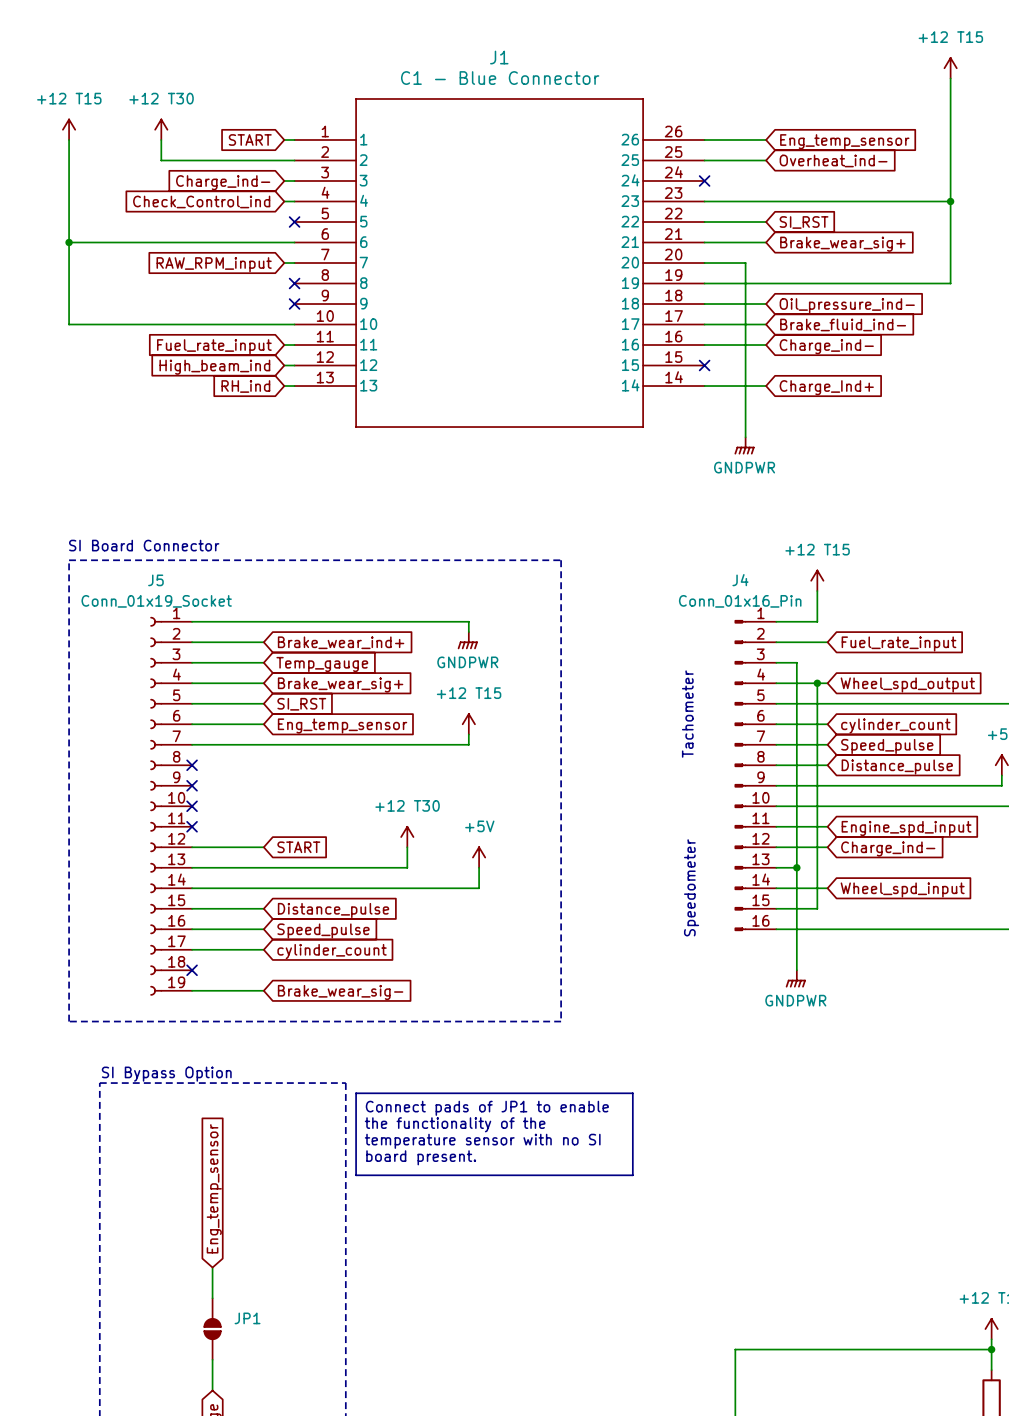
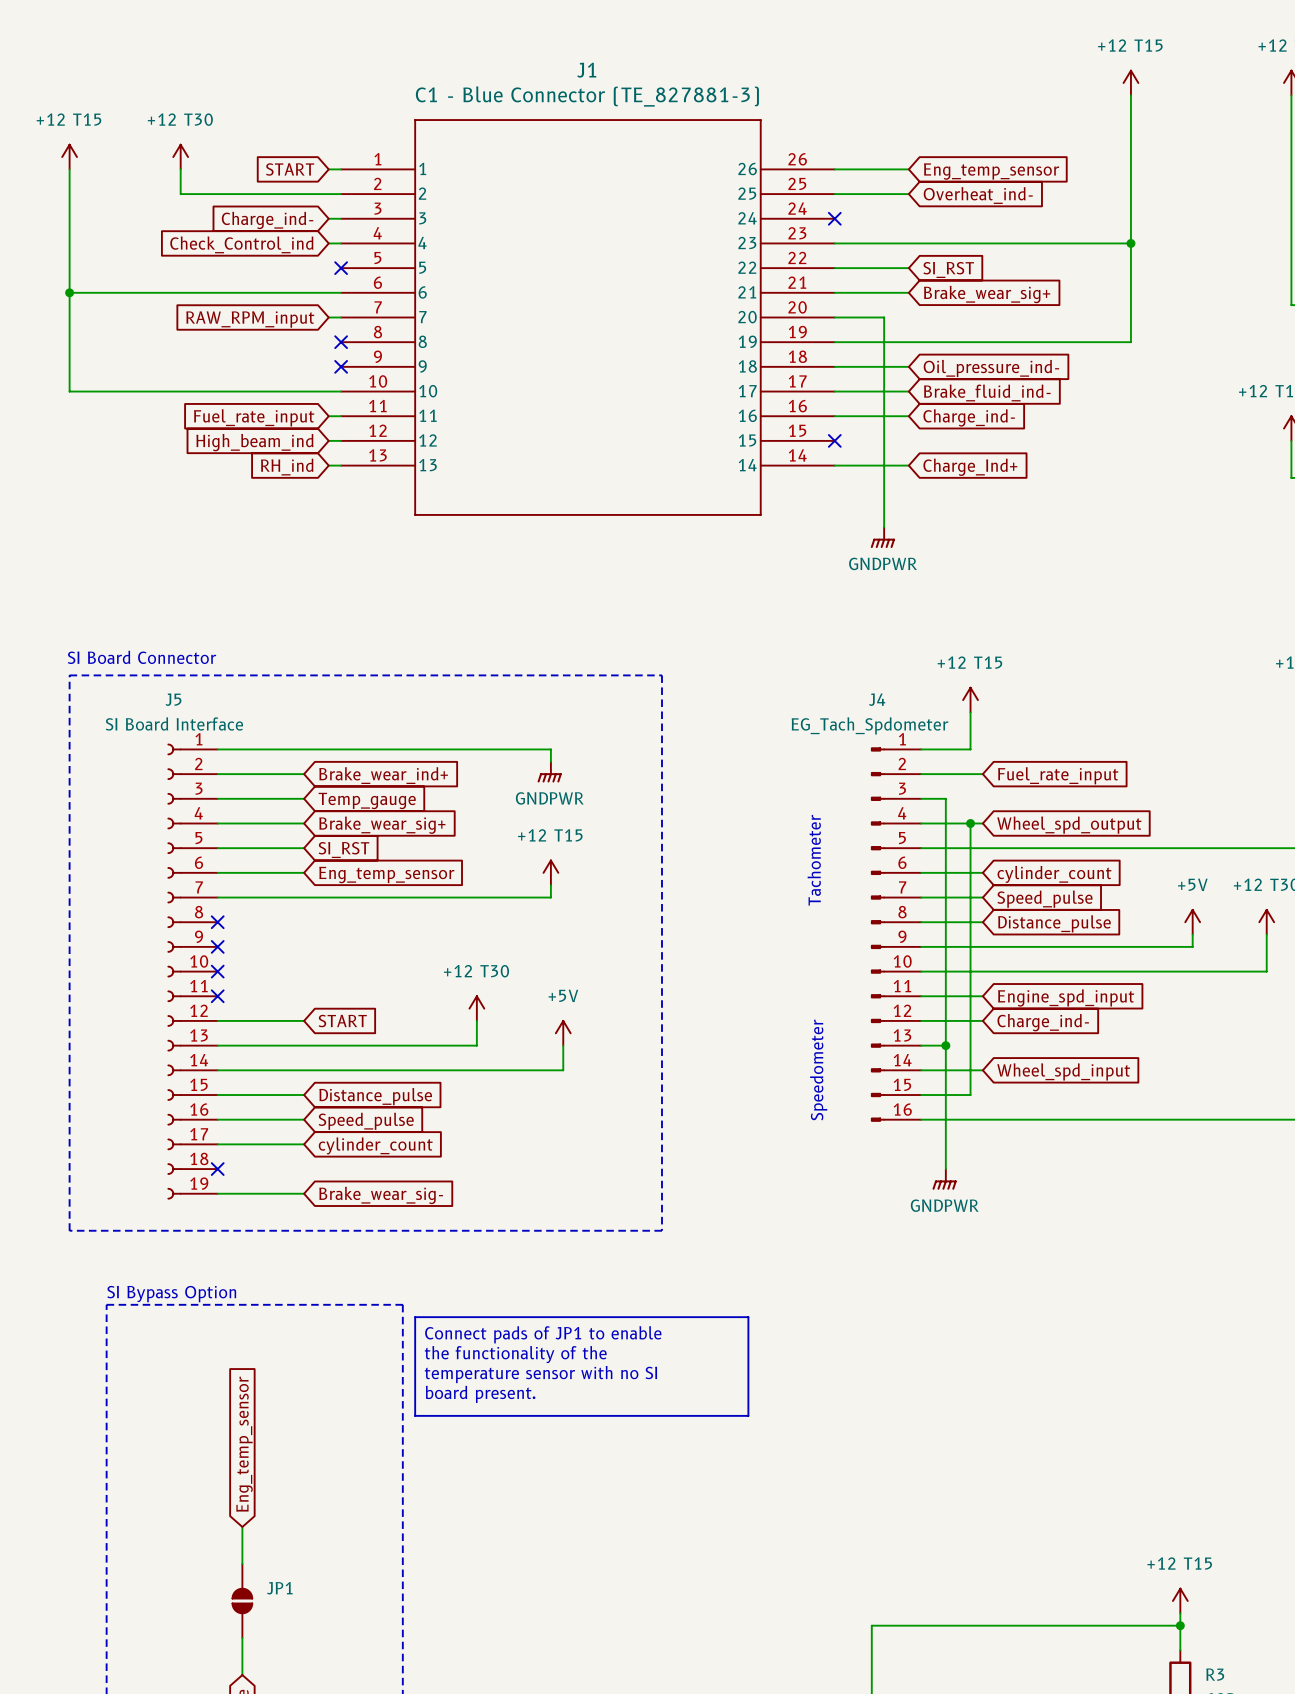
J1 value: C1 - Blue Connector (500, 78) -> C1 - Blue Connector (TE_827881-3) (587, 96)
J5 value: Conn_01x19_Socket (156, 601) -> SI Board Interface (174, 723)
J4 value: Conn_01x16_Pin (740, 601) -> EG_Tach_Spdometer (869, 725)

